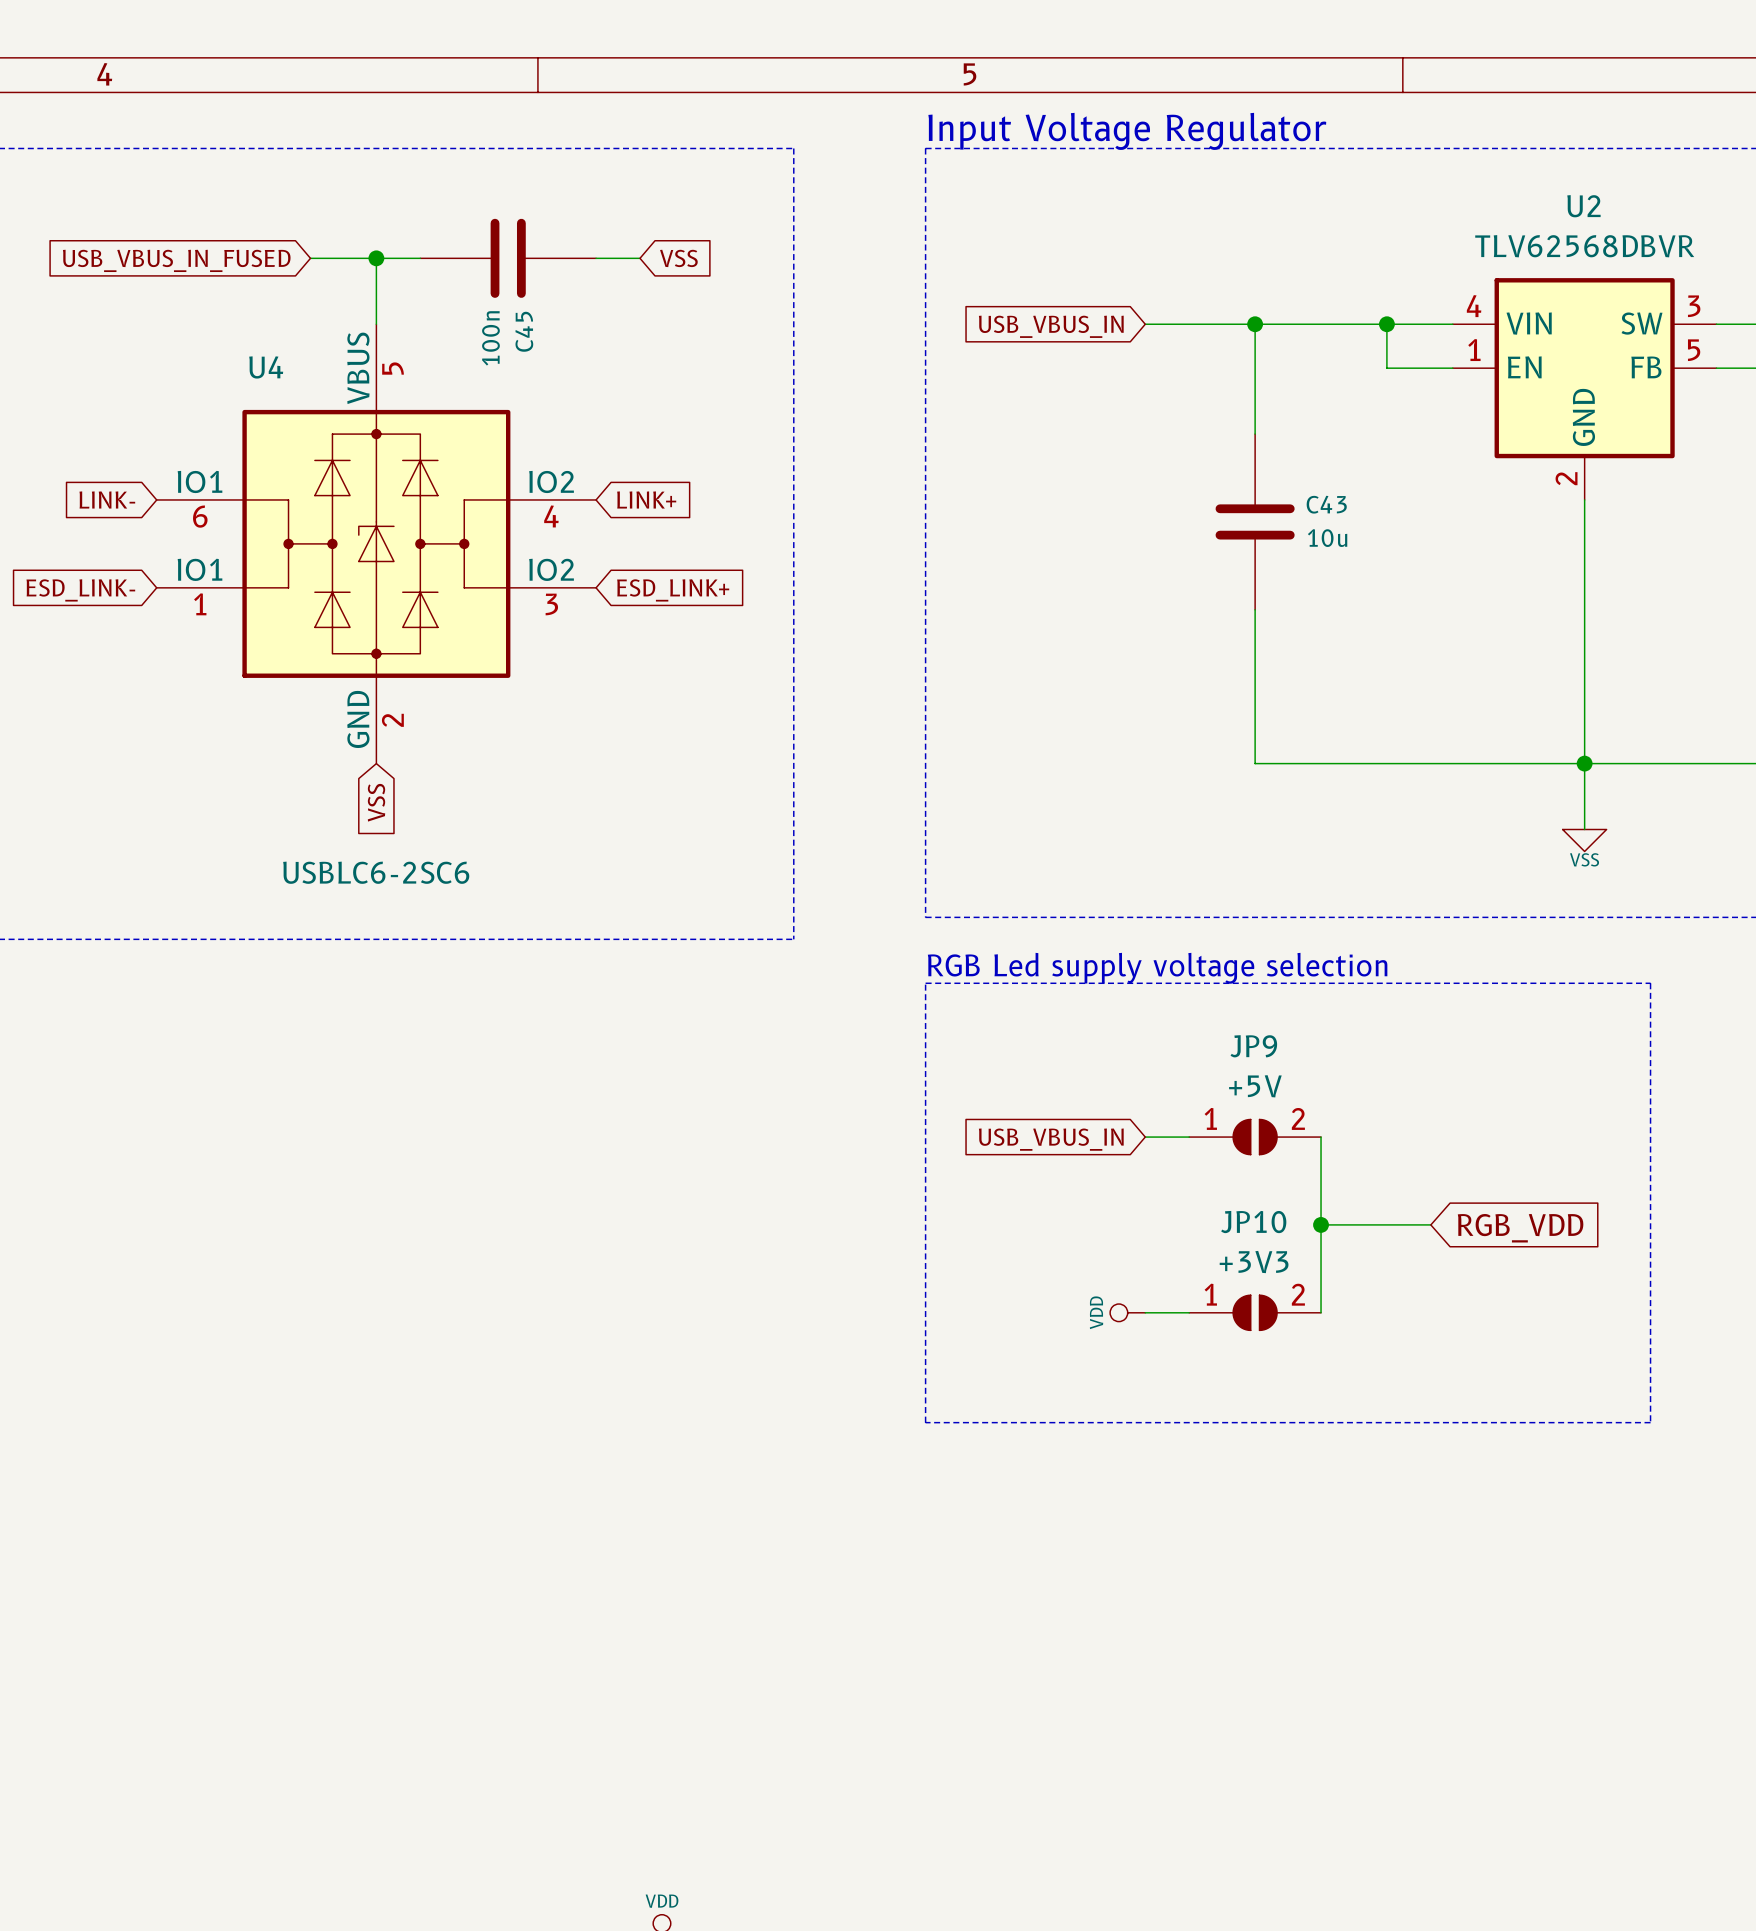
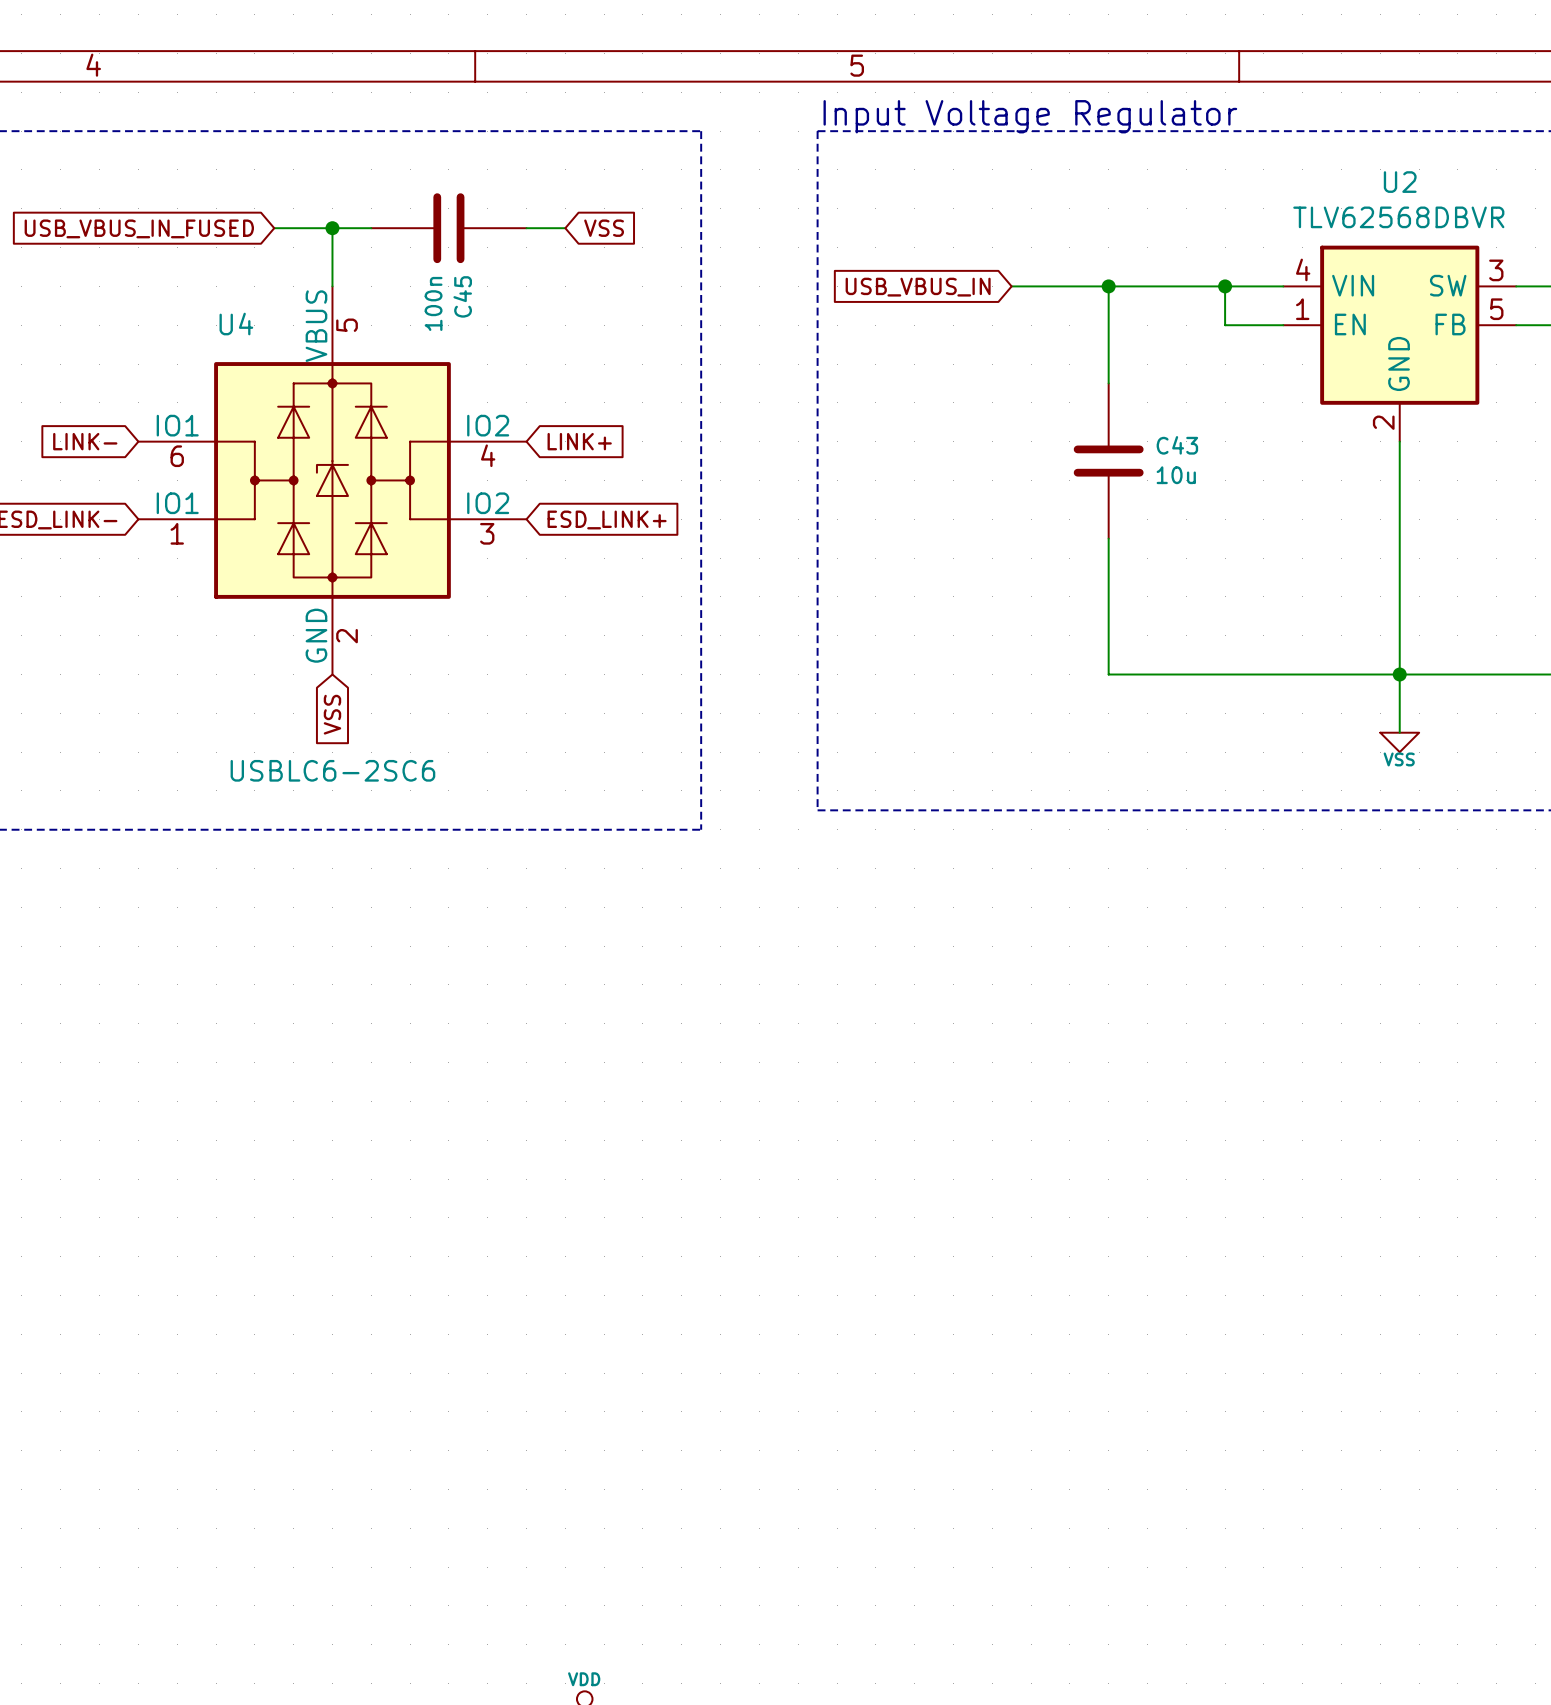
text: RGB Led supply voltage selection (1157, 968) -> none
line: (925, 983) (1650, 983) (1650, 1422) (925, 1422) (925, 983) -> none
wire: (1145, 1137) (1189, 1137) -> none
JP9: +5V (1255, 1137) -> none
wire: (1321, 1137) (1321, 1312) -> none
global label: USB_VBUS_IN (1051, 1139) -> none
wire: (1321, 1224) (1430, 1224) -> none
junction: (1321, 1224) -> none
global label: RGB_VDD (1520, 1228) -> none
power symbol: VDD (1127, 1312) -> none
wire: (1145, 1312) (1189, 1312) -> none
JP10: +3V3 (1255, 1312) -> none

